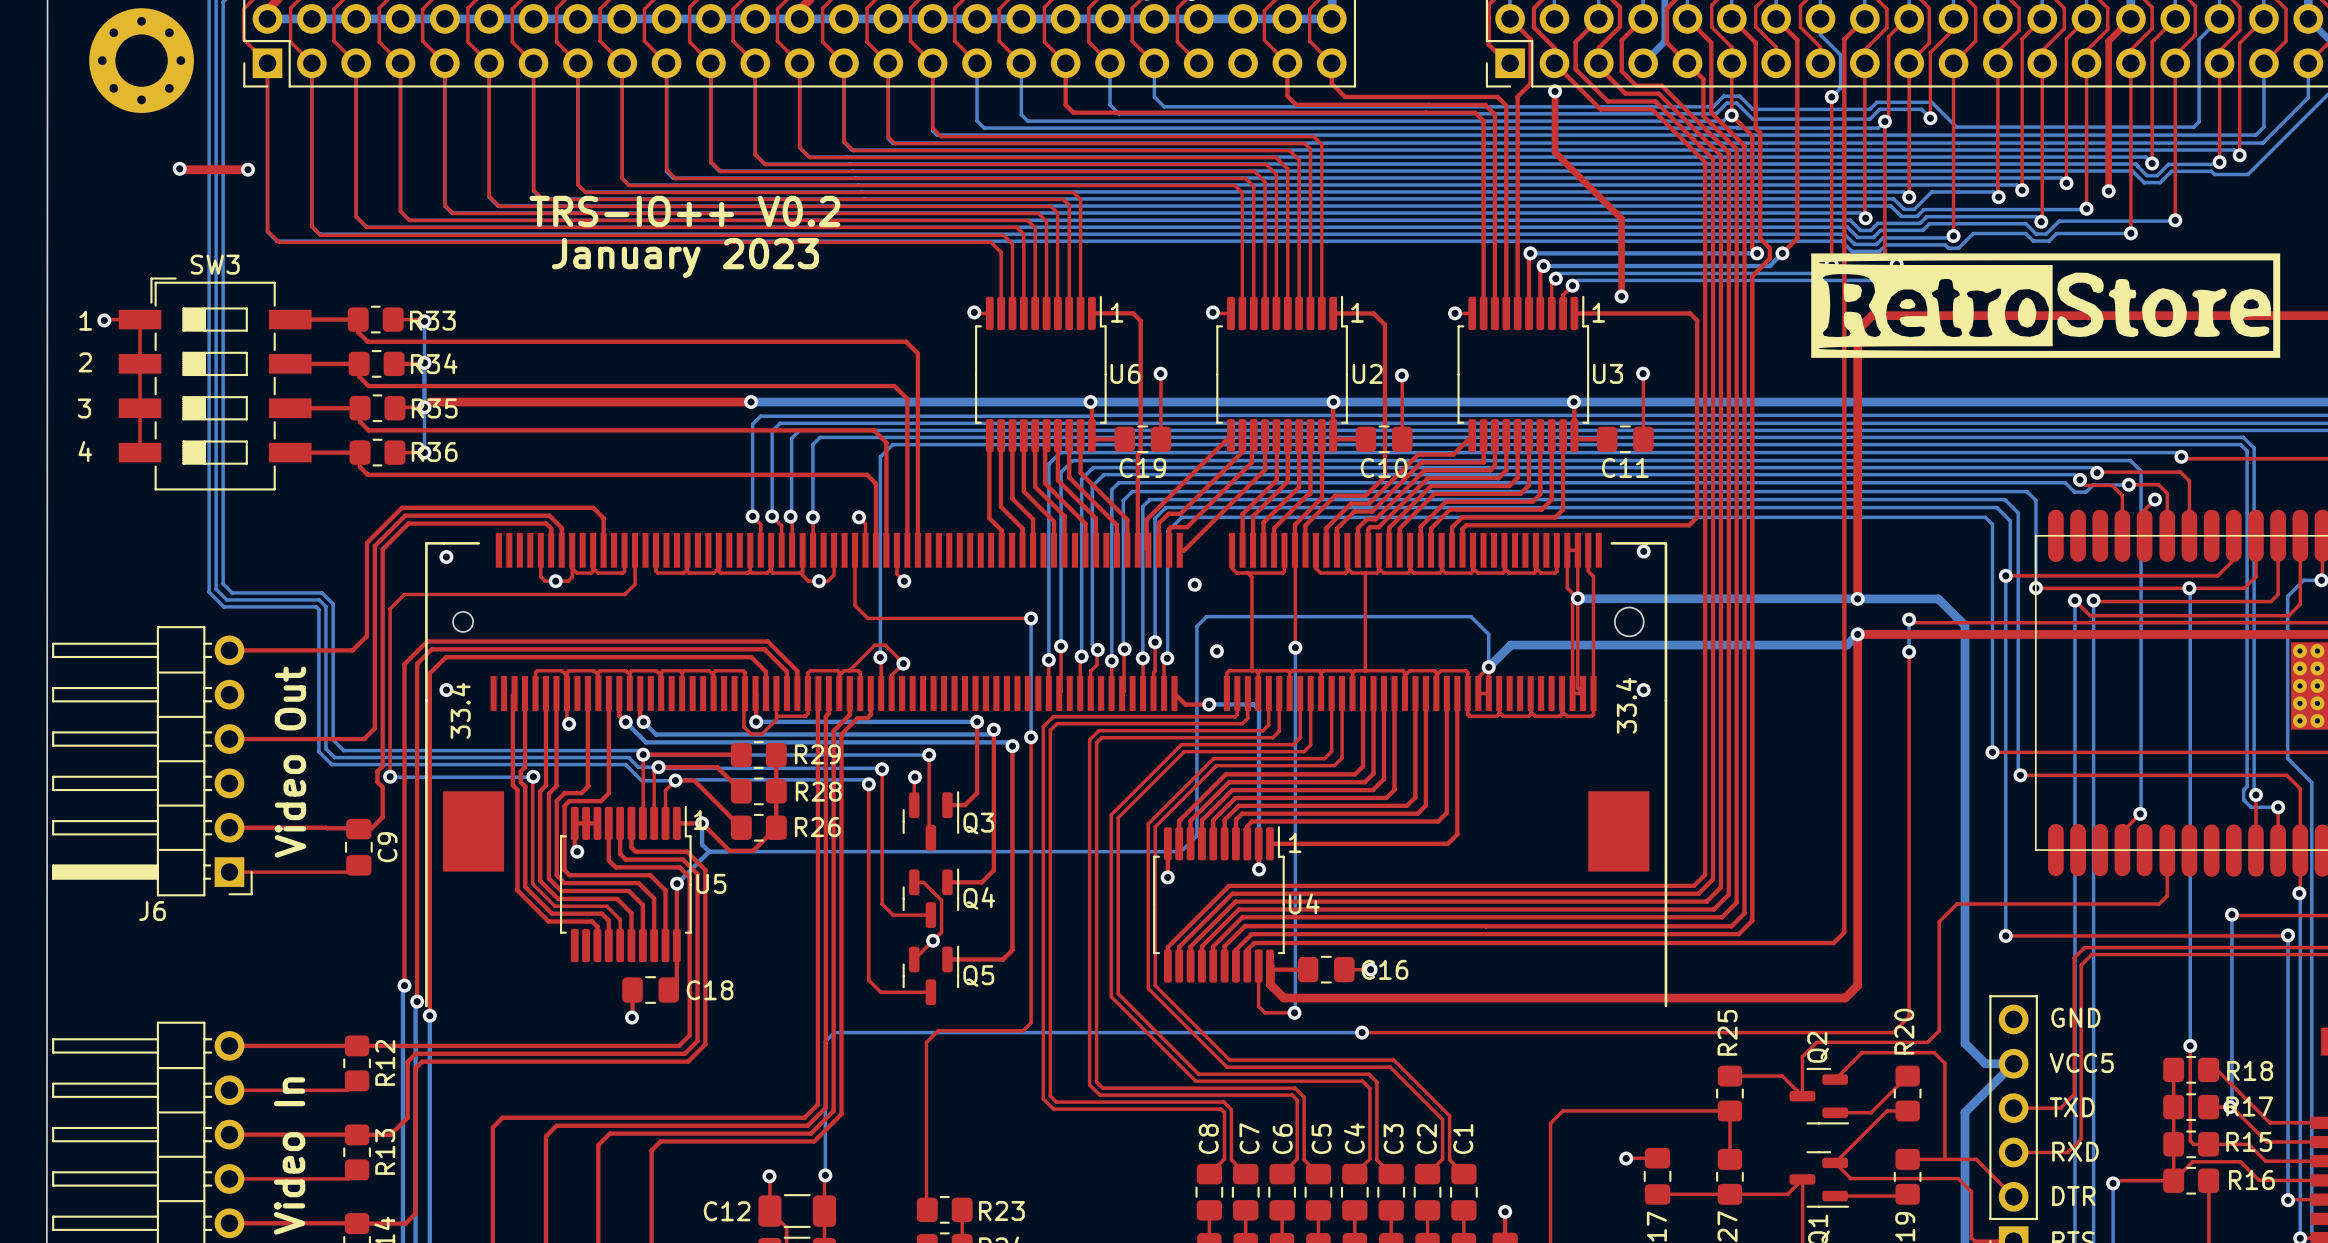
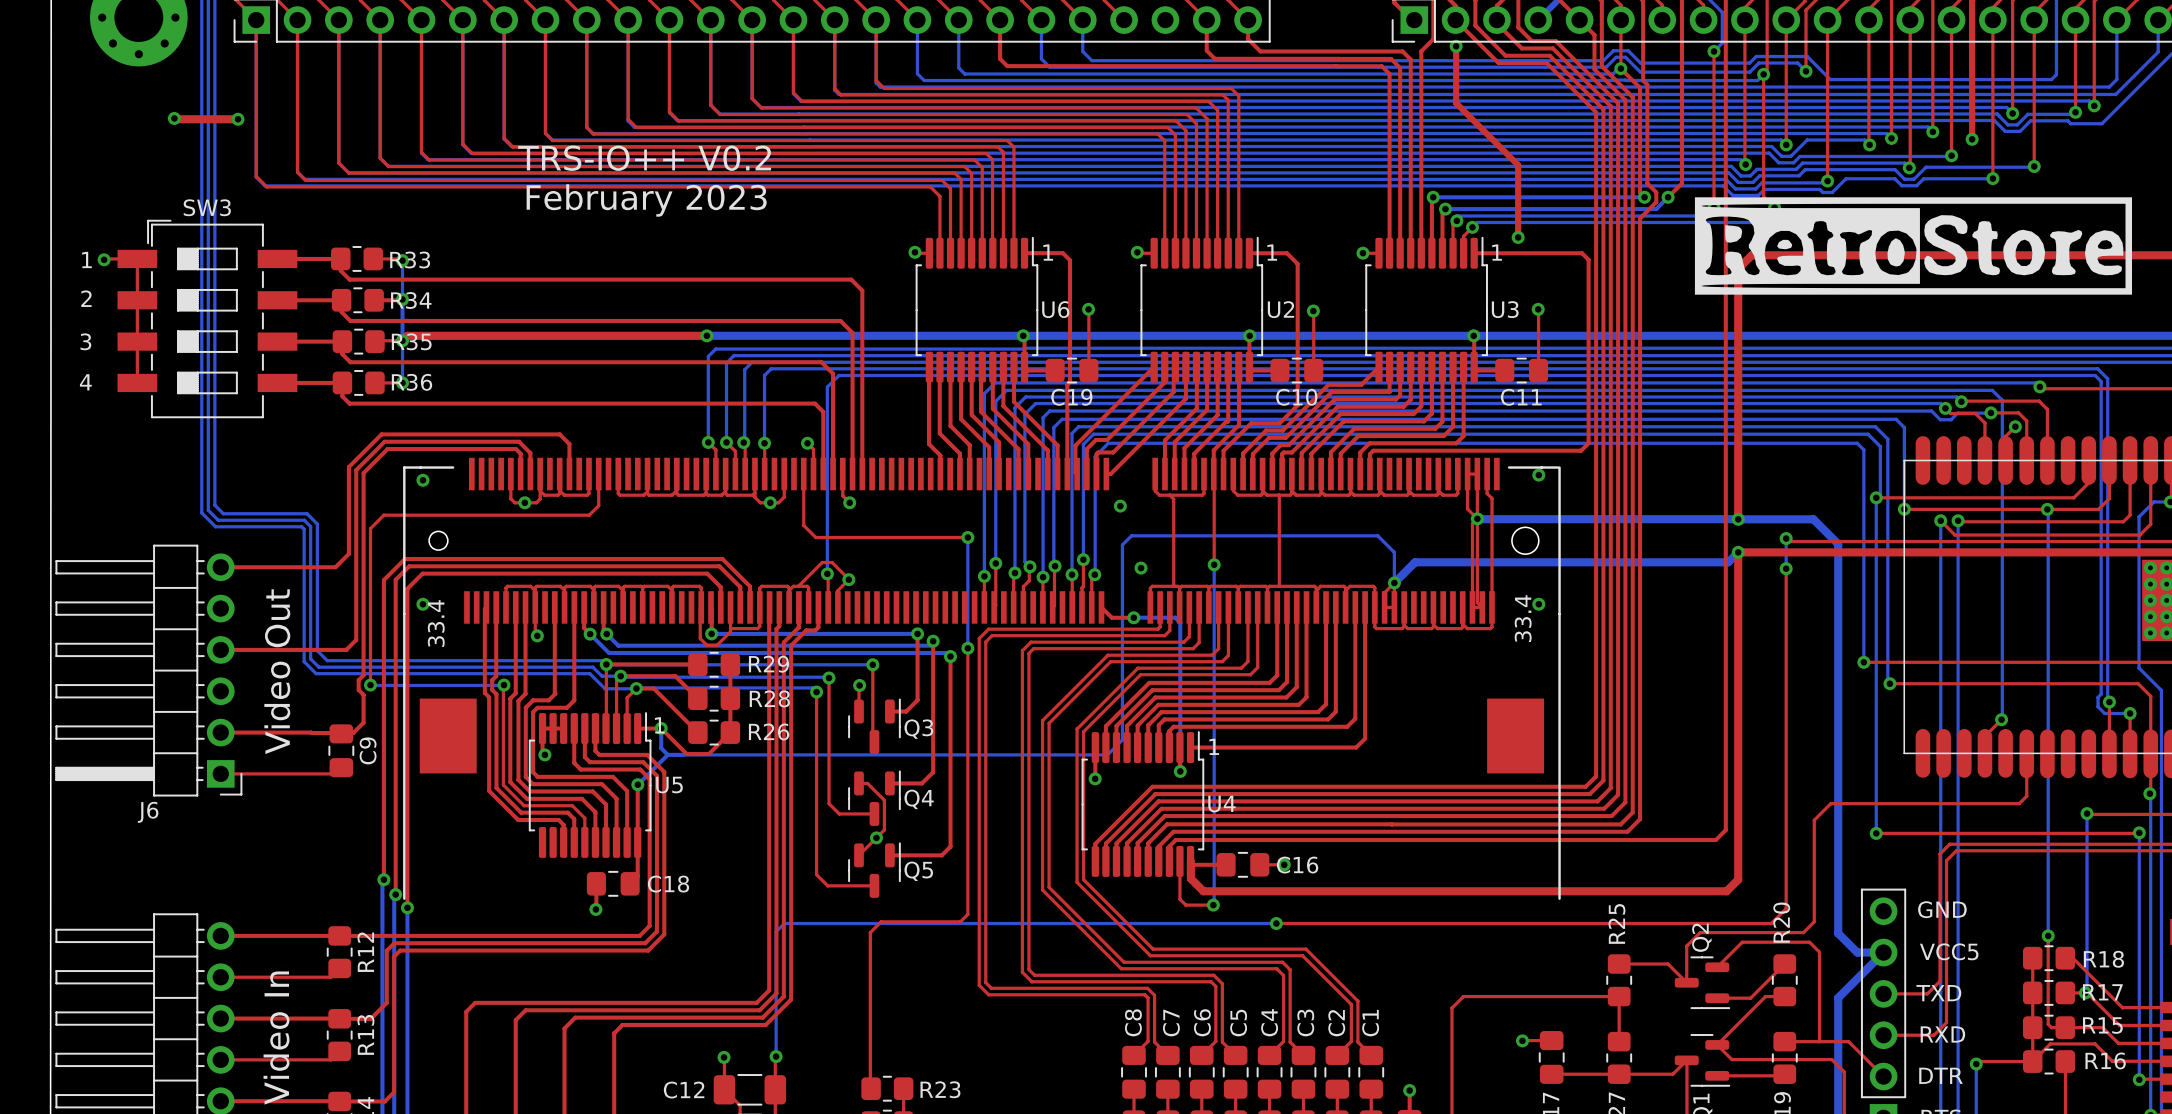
text: January 2023 (685, 258) -> February 2023 (646, 200)

